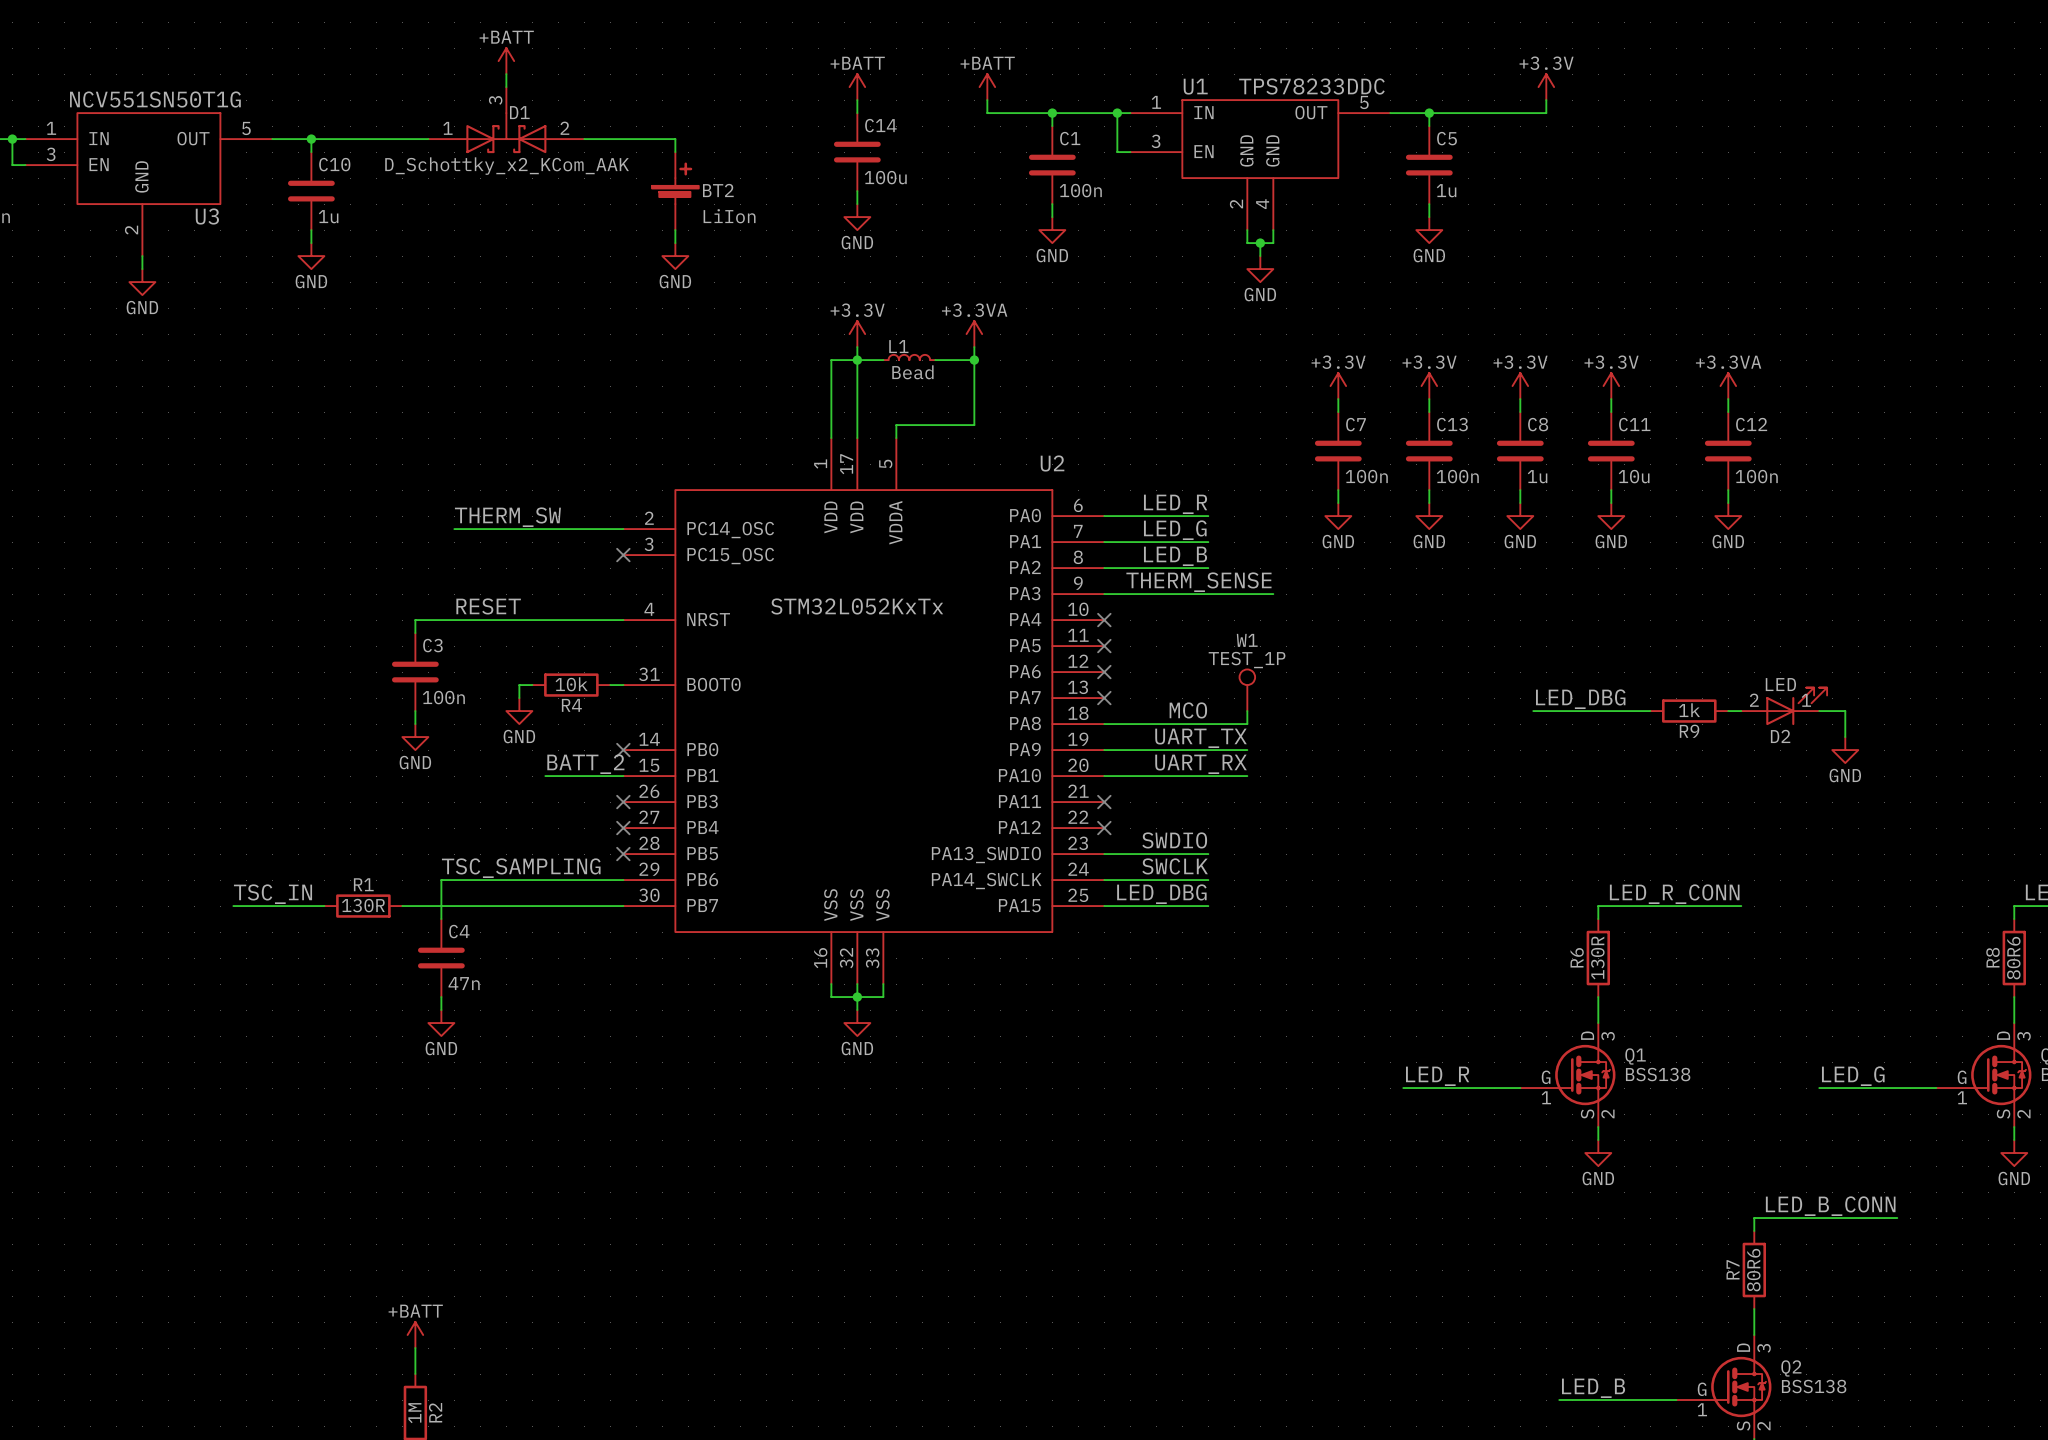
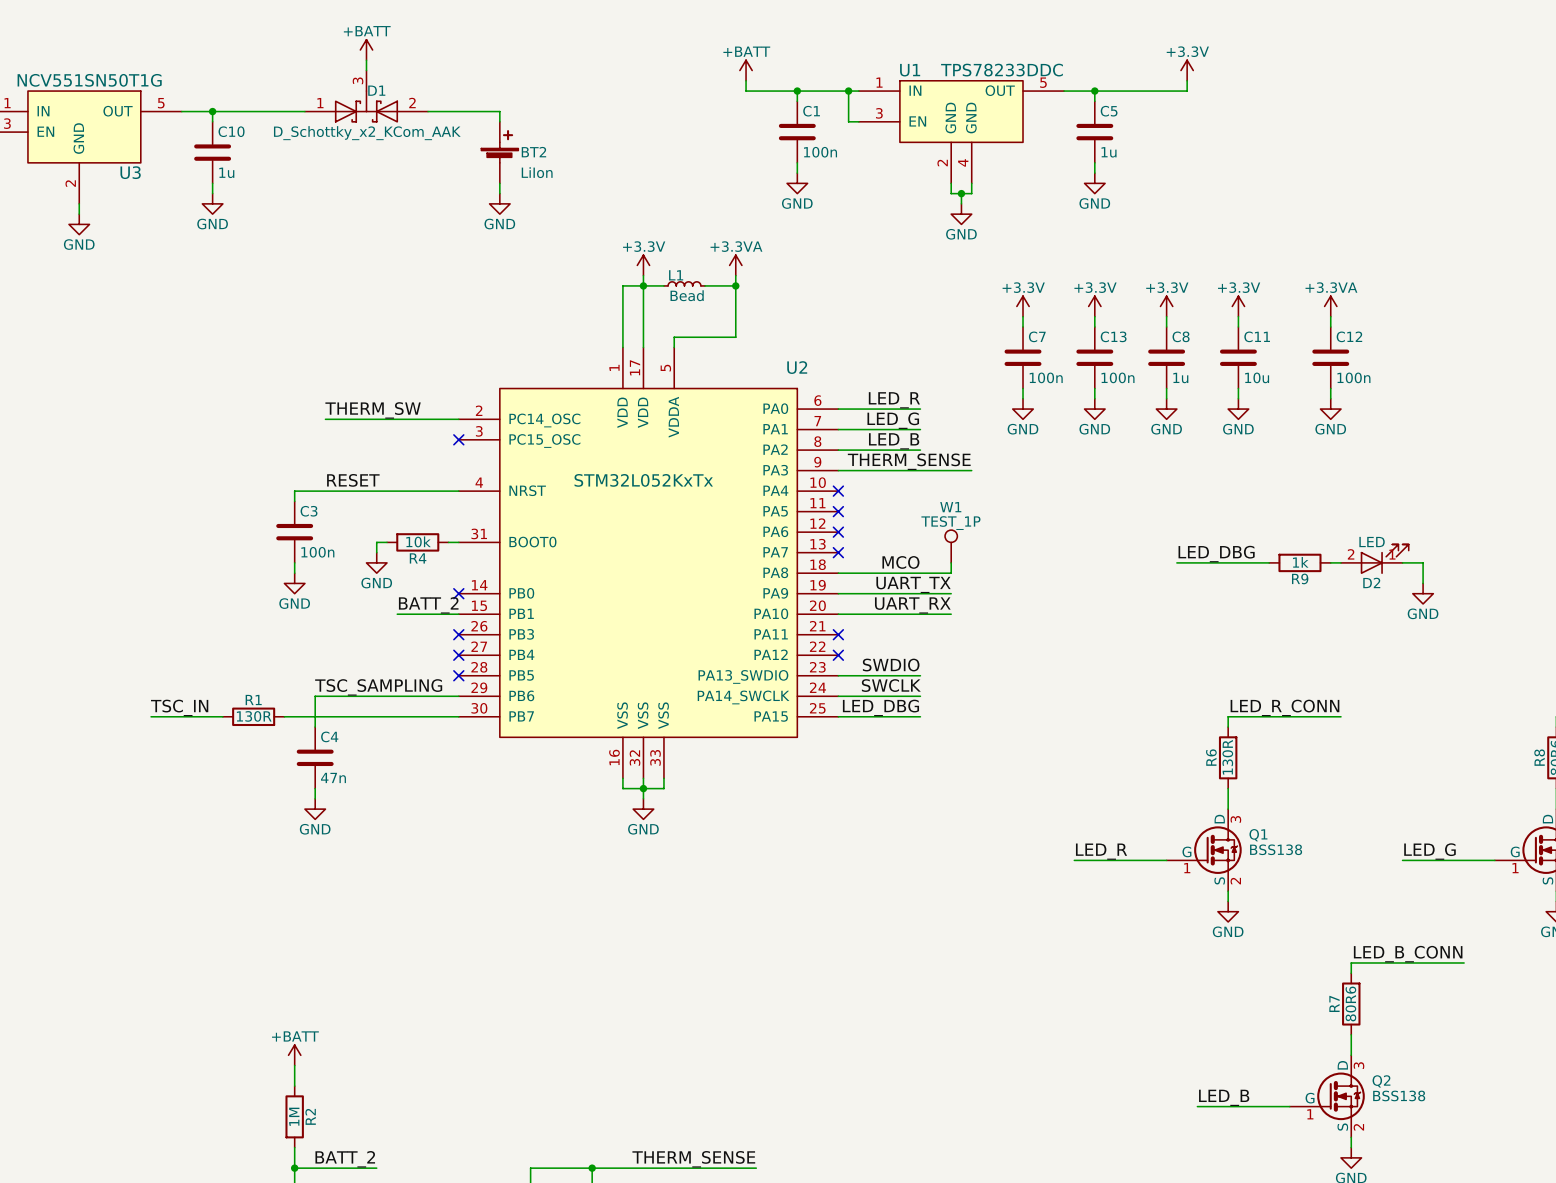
power symbol: +BATT (857, 87) -> none
wire: (857, 100) (857, 113) -> none
C14: 100u (857, 152) -> none
wire: (857, 191) (857, 204) -> none
power symbol: GND (857, 217) -> none

